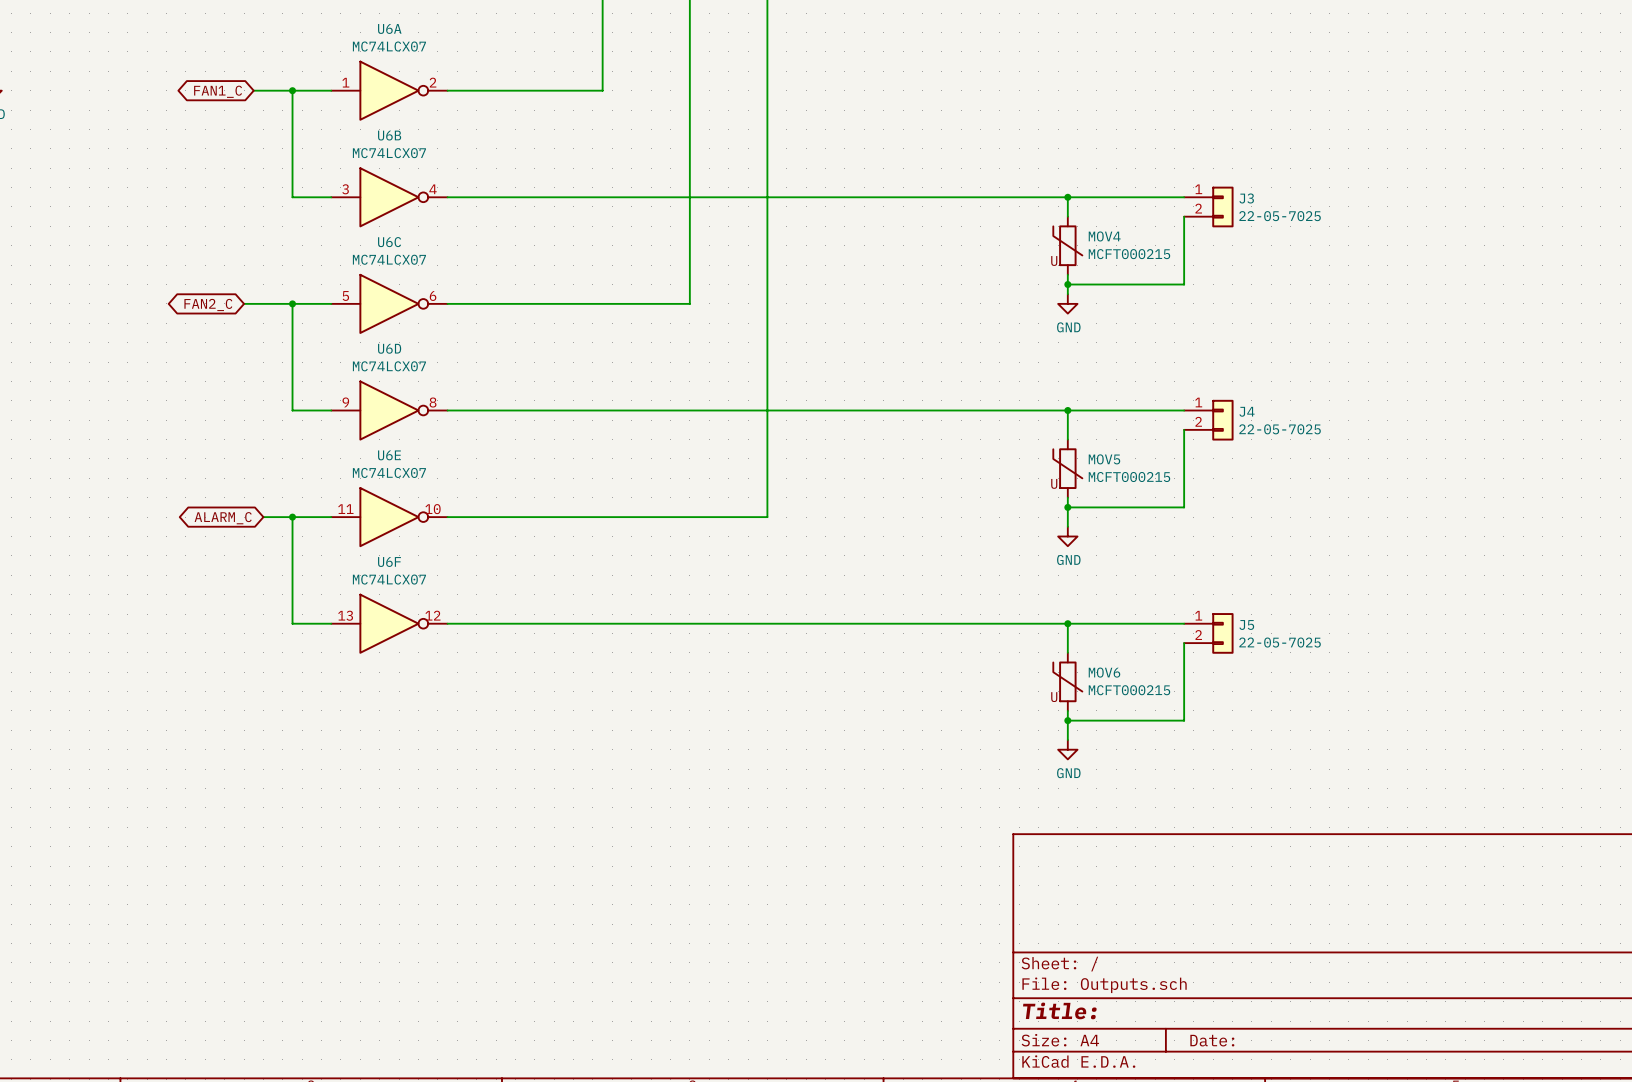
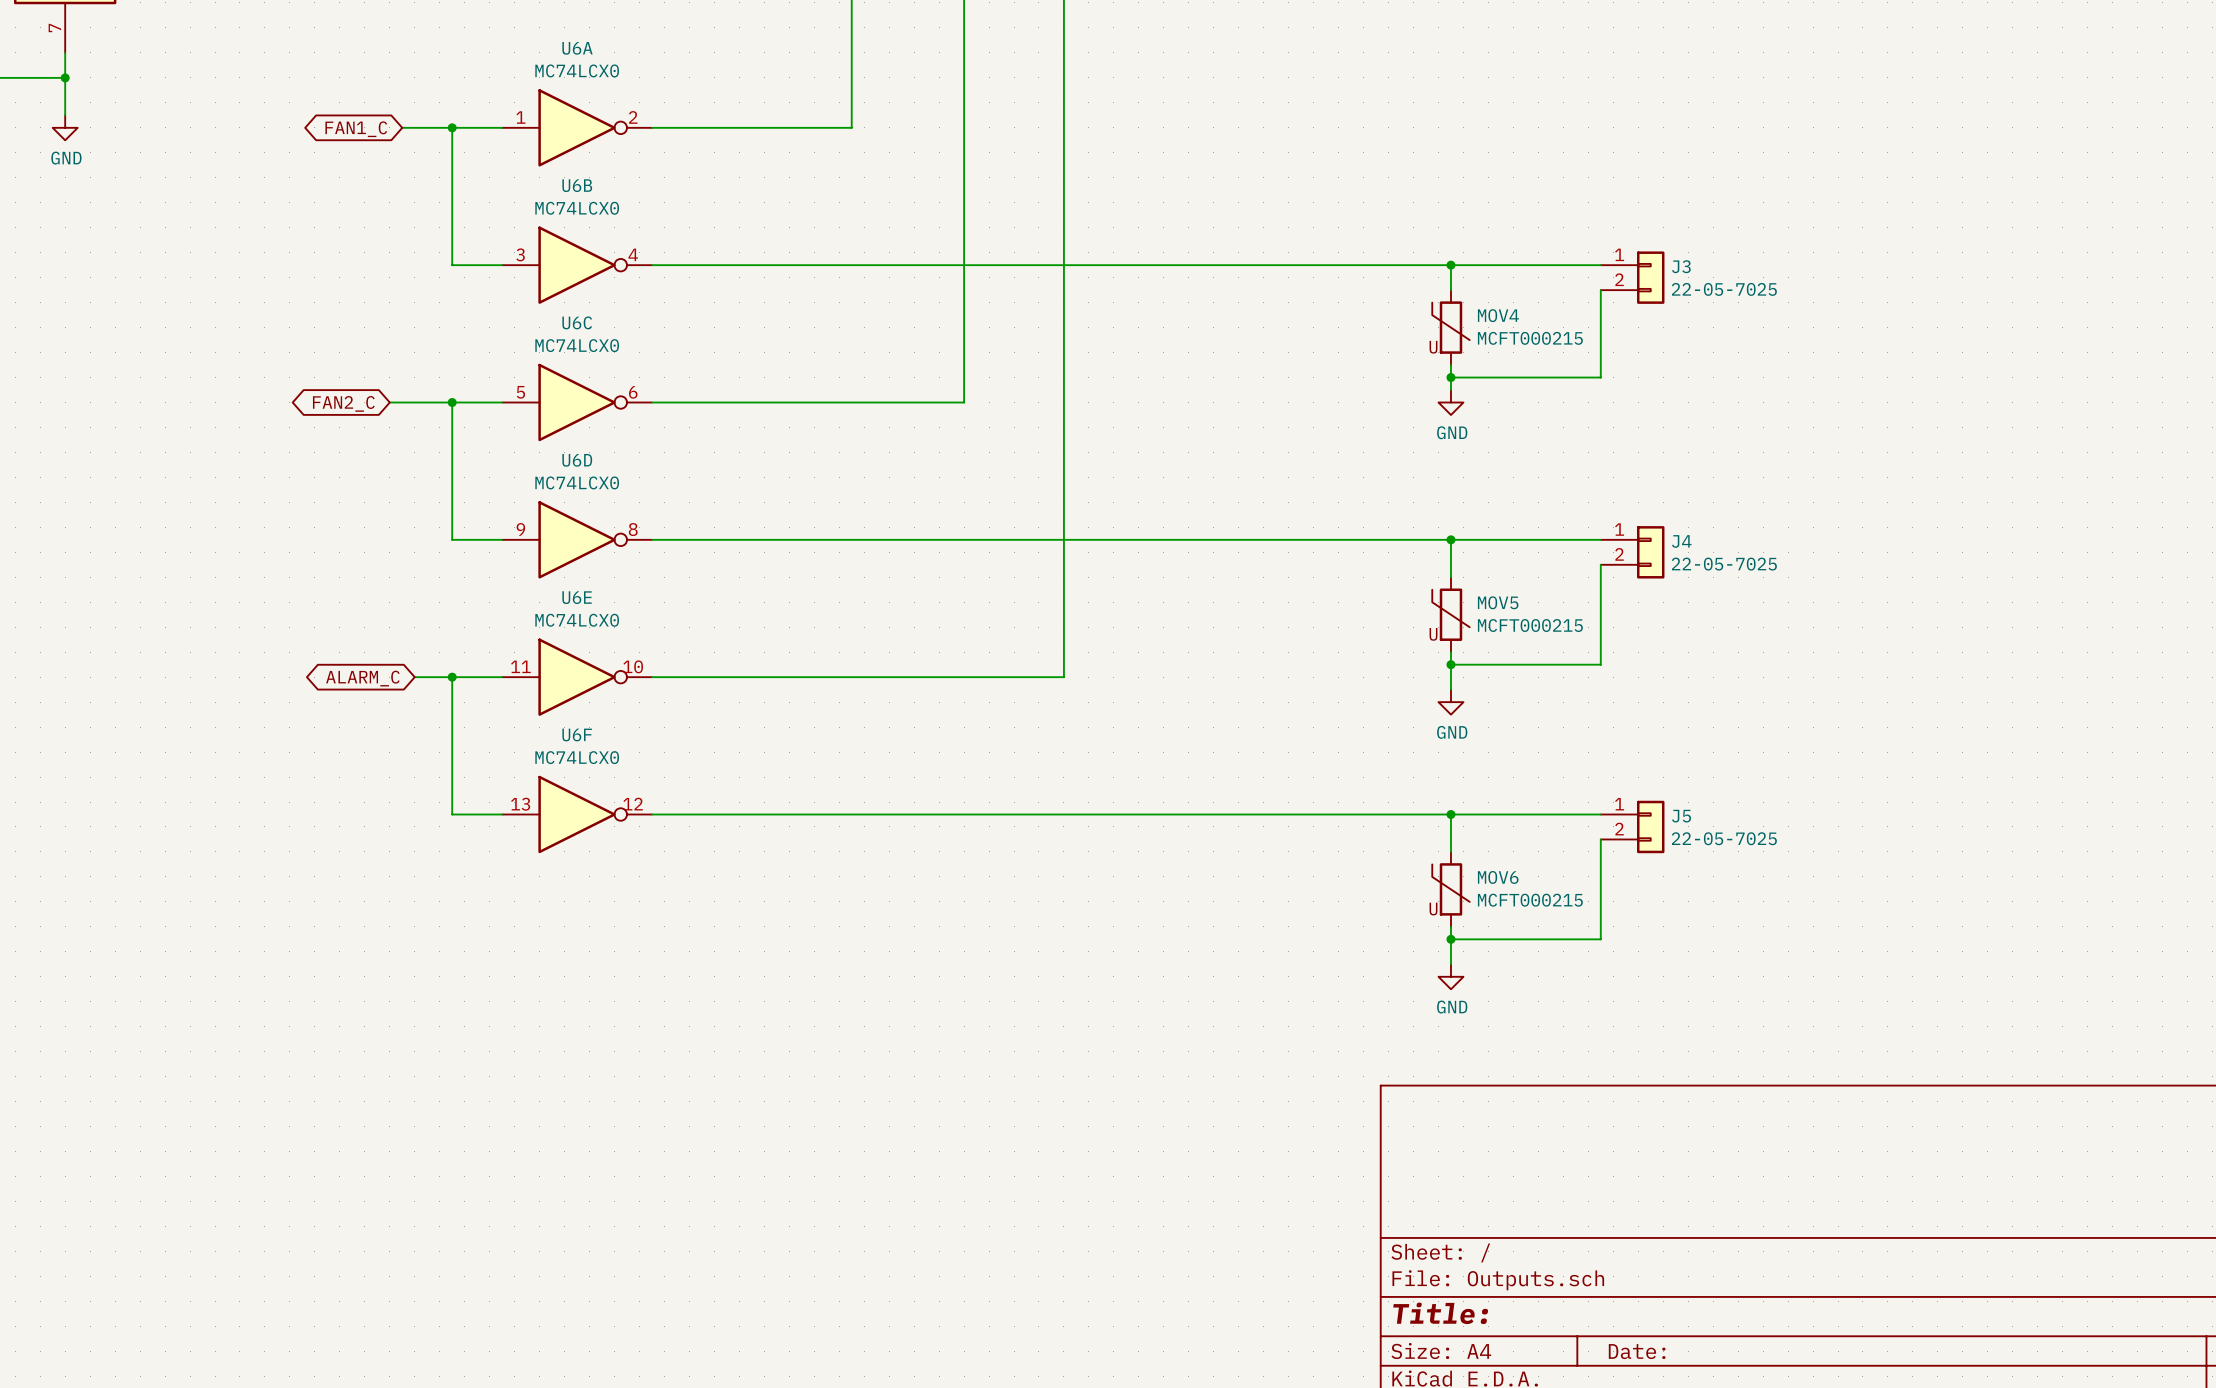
U6A value: MC74LCX07 (389, 46) -> MC74LCX0 (577, 70)
U6B value: MC74LCX07 (389, 153) -> MC74LCX0 (577, 208)
U6C value: MC74LCX07 (389, 259) -> MC74LCX0 (577, 345)
U6D value: MC74LCX07 (389, 366) -> MC74LCX0 (577, 482)
U6E value: MC74LCX07 (389, 472) -> MC74LCX0 (577, 620)
U6F value: MC74LCX07 (389, 579) -> MC74LCX0 (577, 757)

